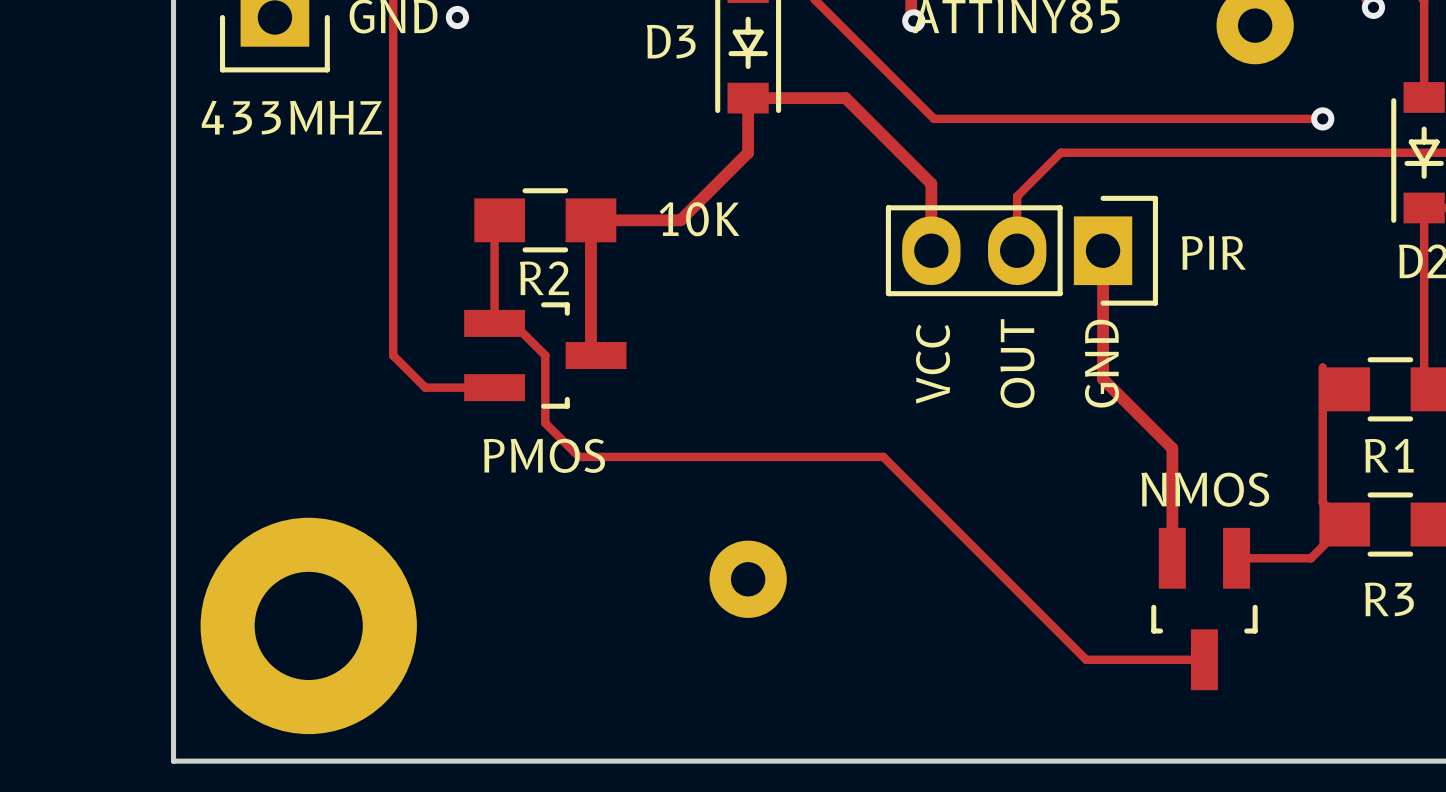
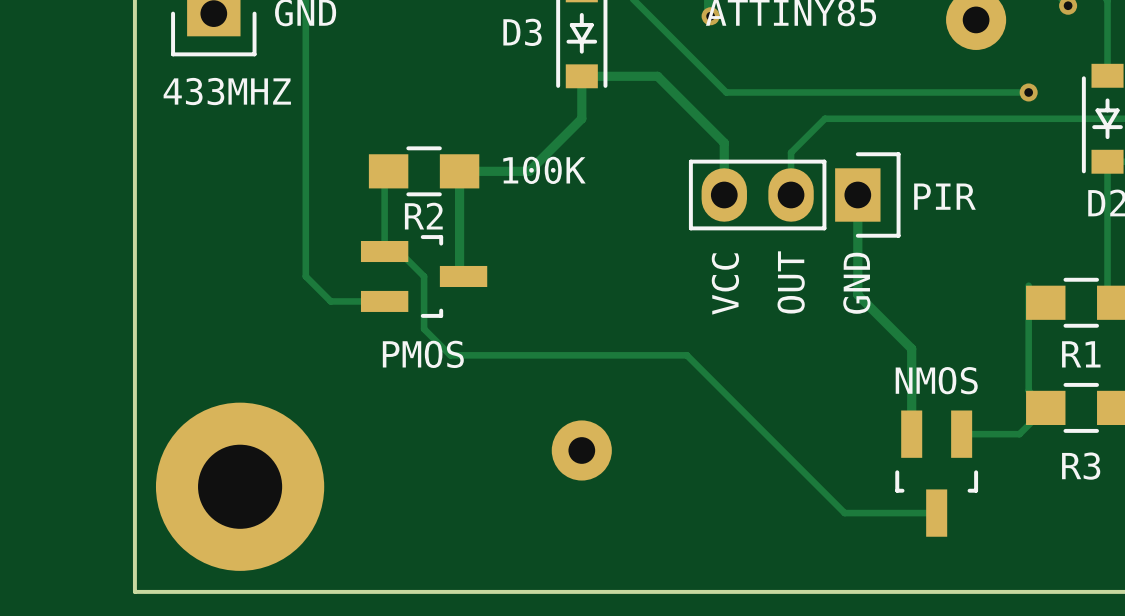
via: (457, 17) -> none
R2 value: 10K (699, 219) -> 100K (544, 170)

